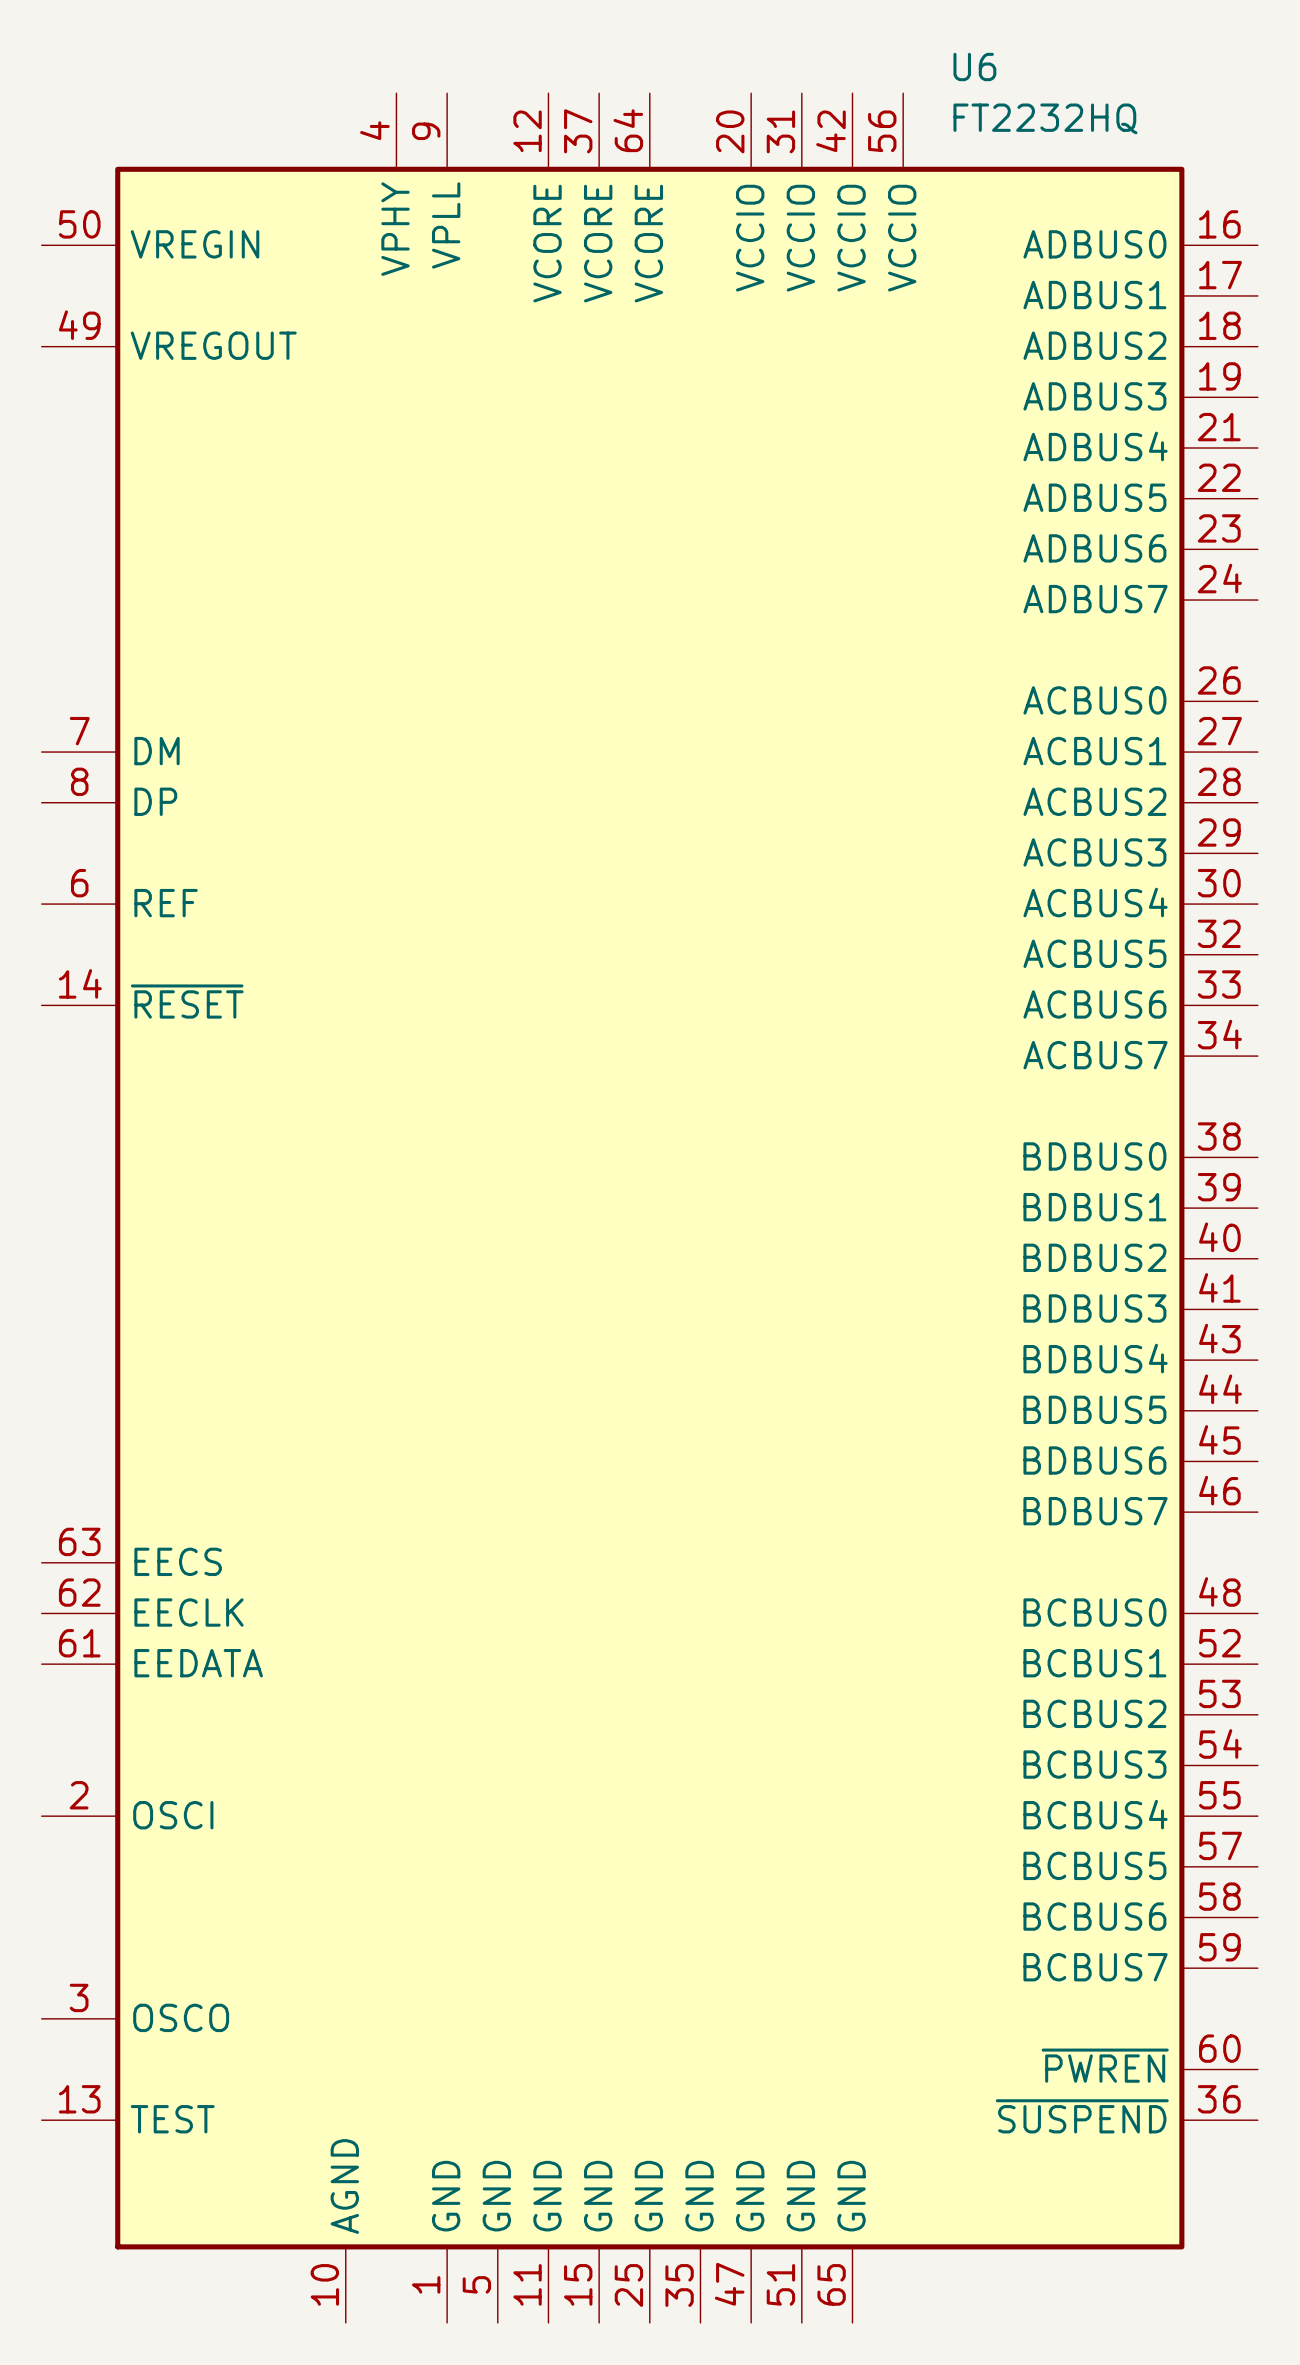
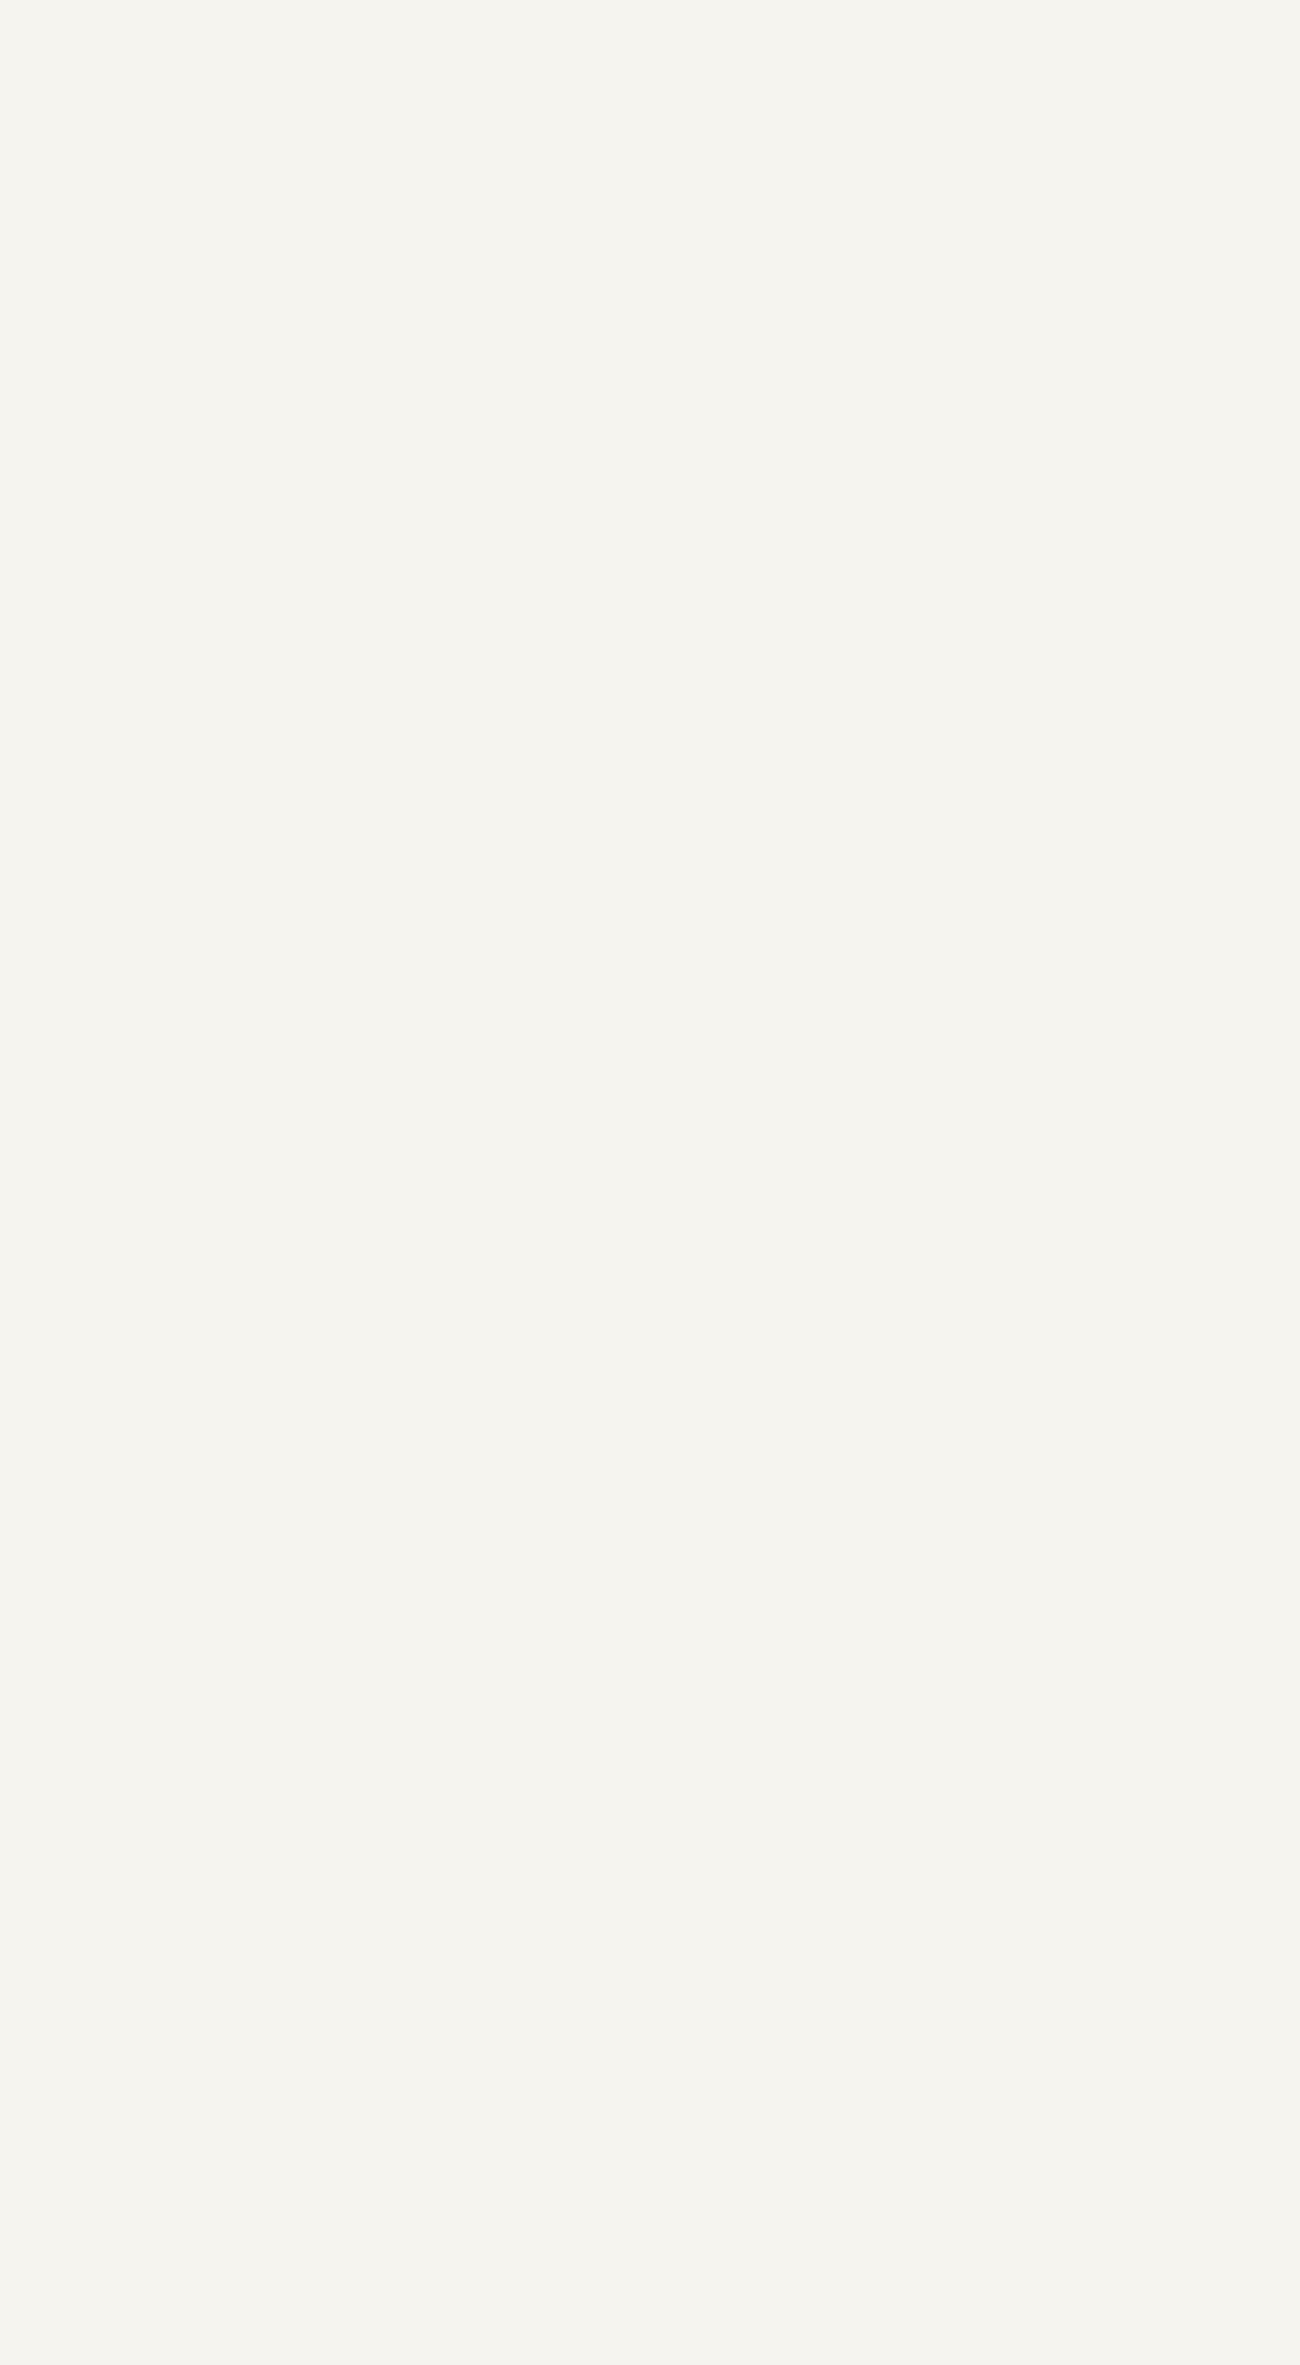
U6: FT2232HQ (649, 1208) -> none

